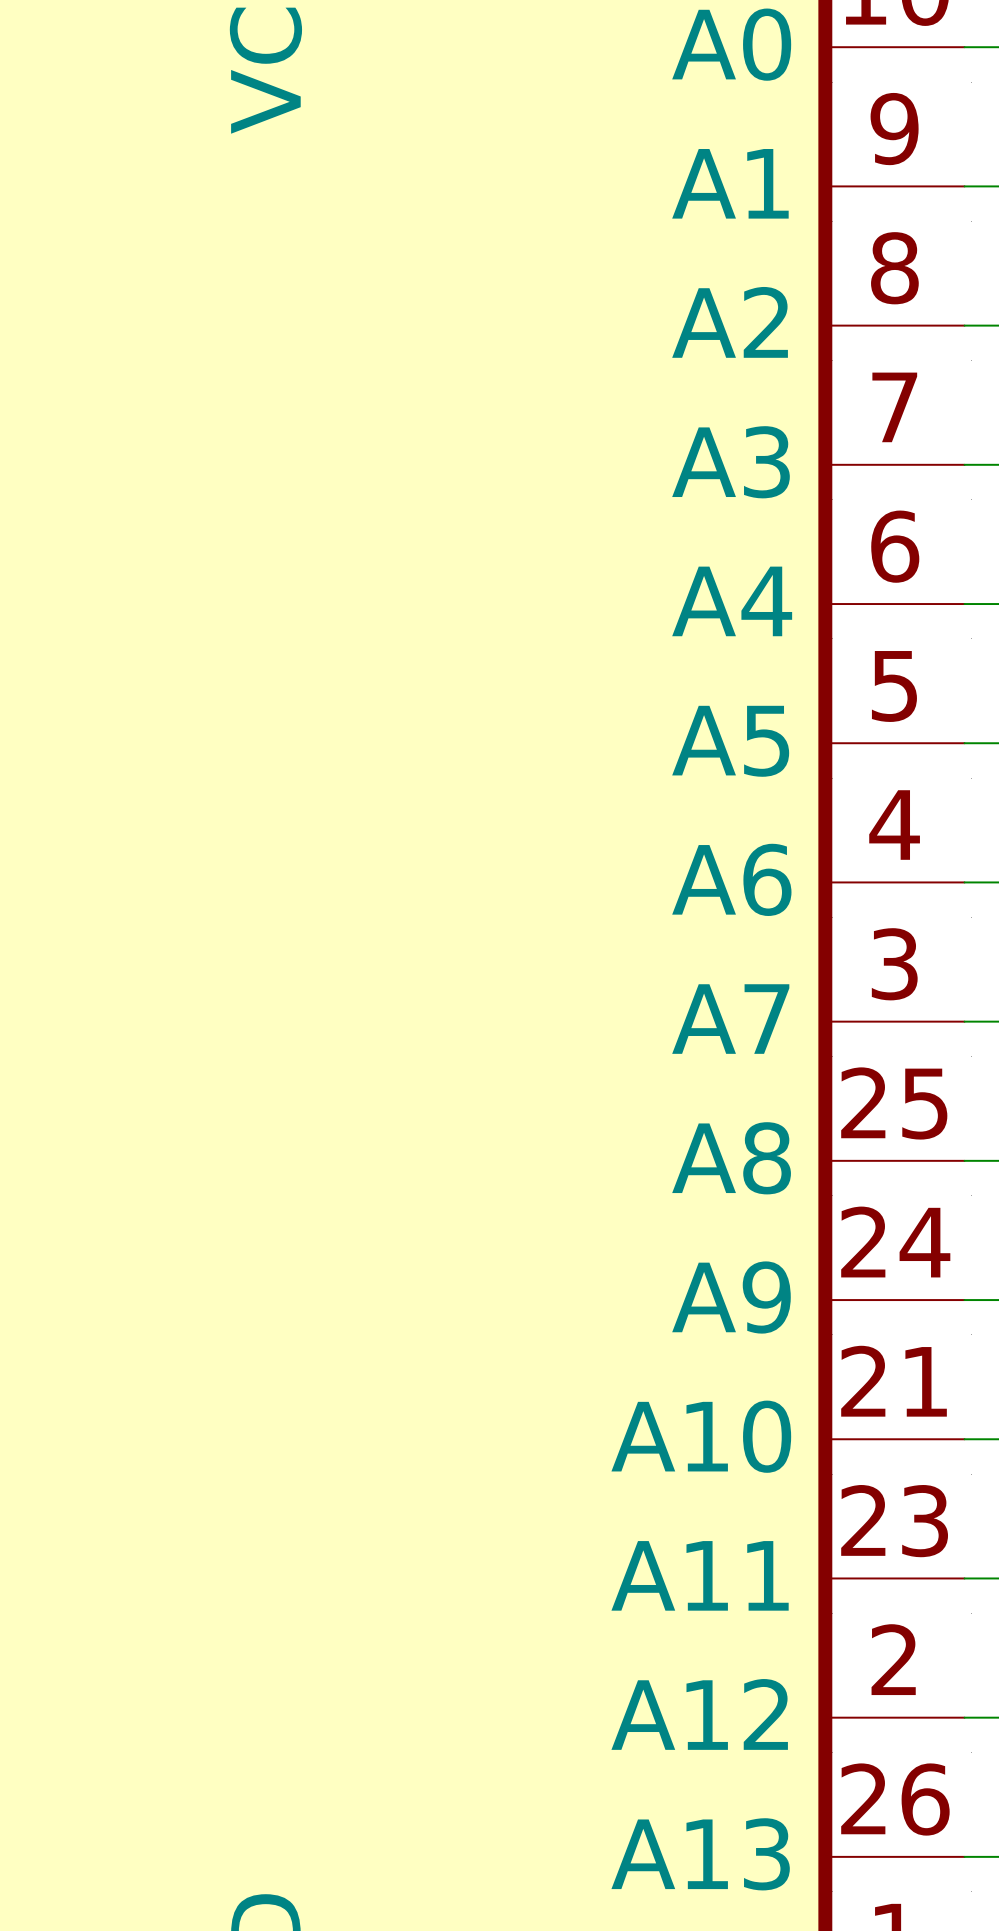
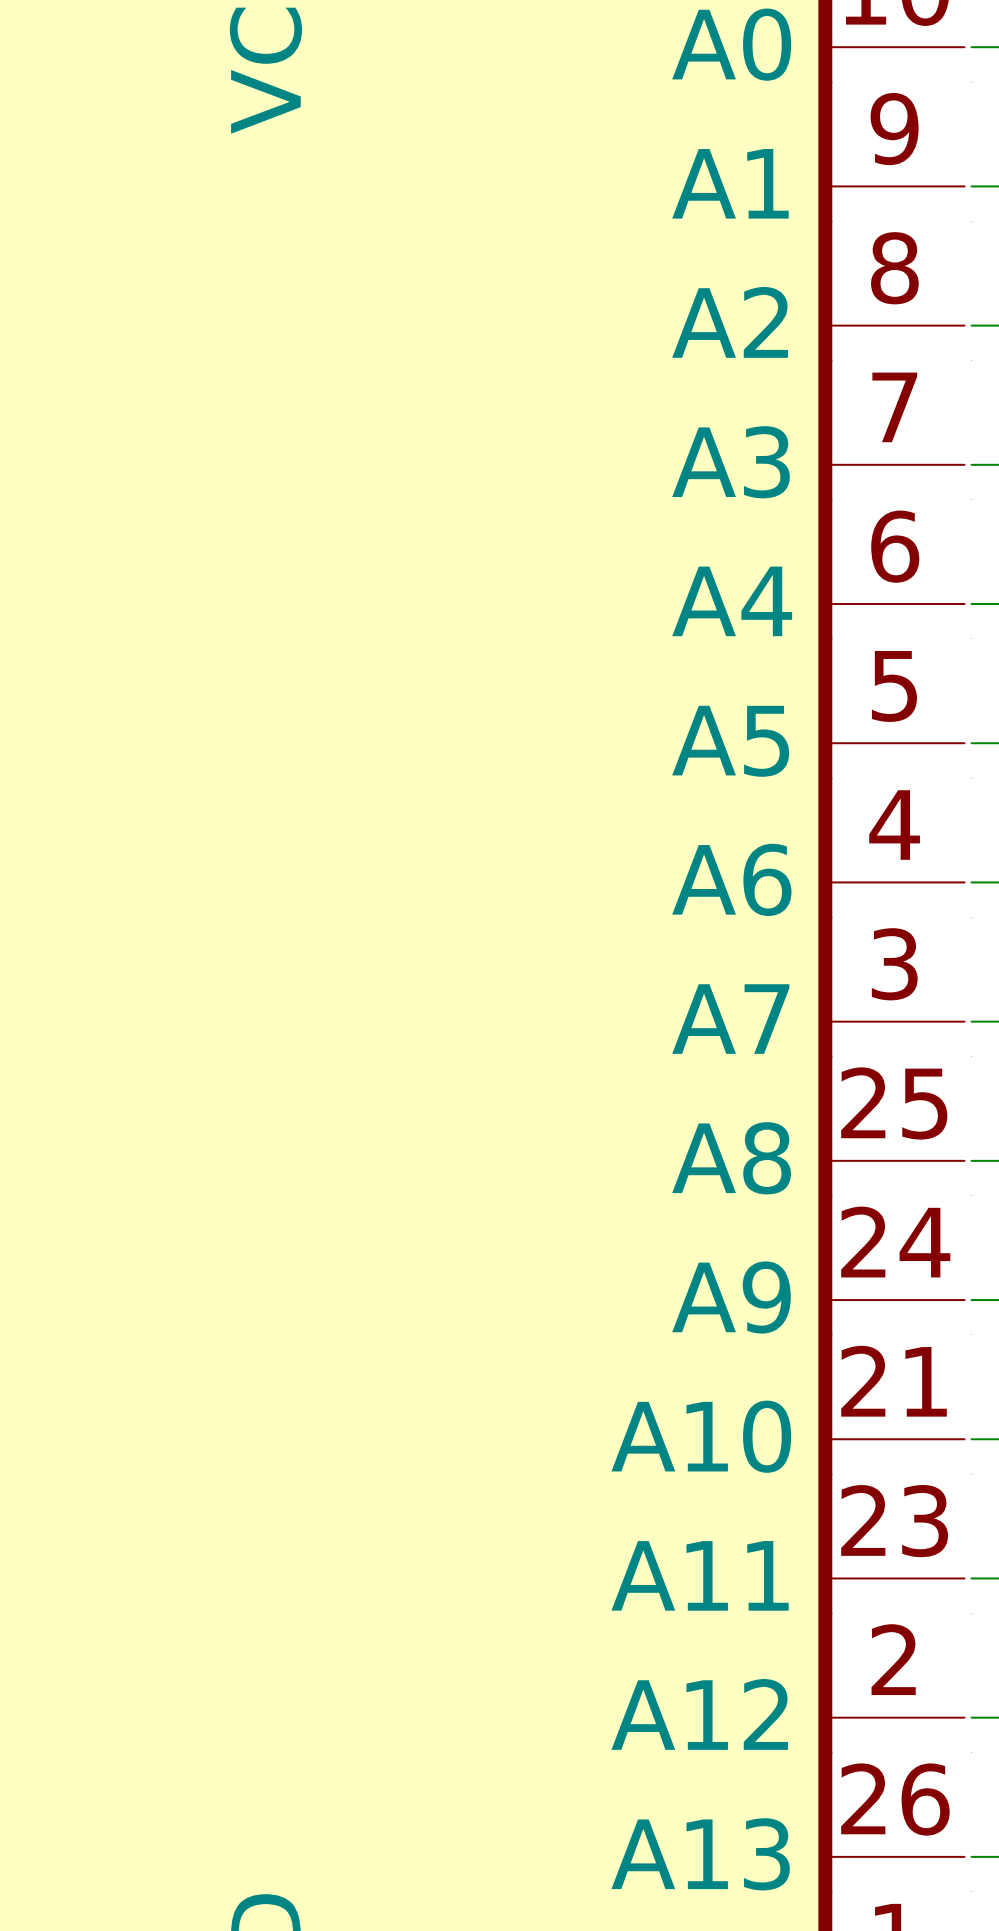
wire: (964, 47) (971, 47) -> none
wire: (964, 186) (971, 186) -> none
wire: (964, 325) (971, 325) -> none
wire: (964, 464) (971, 464) -> none
wire: (964, 604) (971, 604) -> none
wire: (964, 743) (971, 743) -> none
wire: (964, 882) (971, 882) -> none
wire: (964, 1021) (971, 1021) -> none
wire: (964, 1160) (971, 1160) -> none
wire: (964, 1300) (971, 1300) -> none
wire: (964, 1439) (971, 1439) -> none
wire: (964, 1578) (971, 1578) -> none
wire: (964, 1717) (971, 1717) -> none
wire: (964, 1856) (971, 1856) -> none

